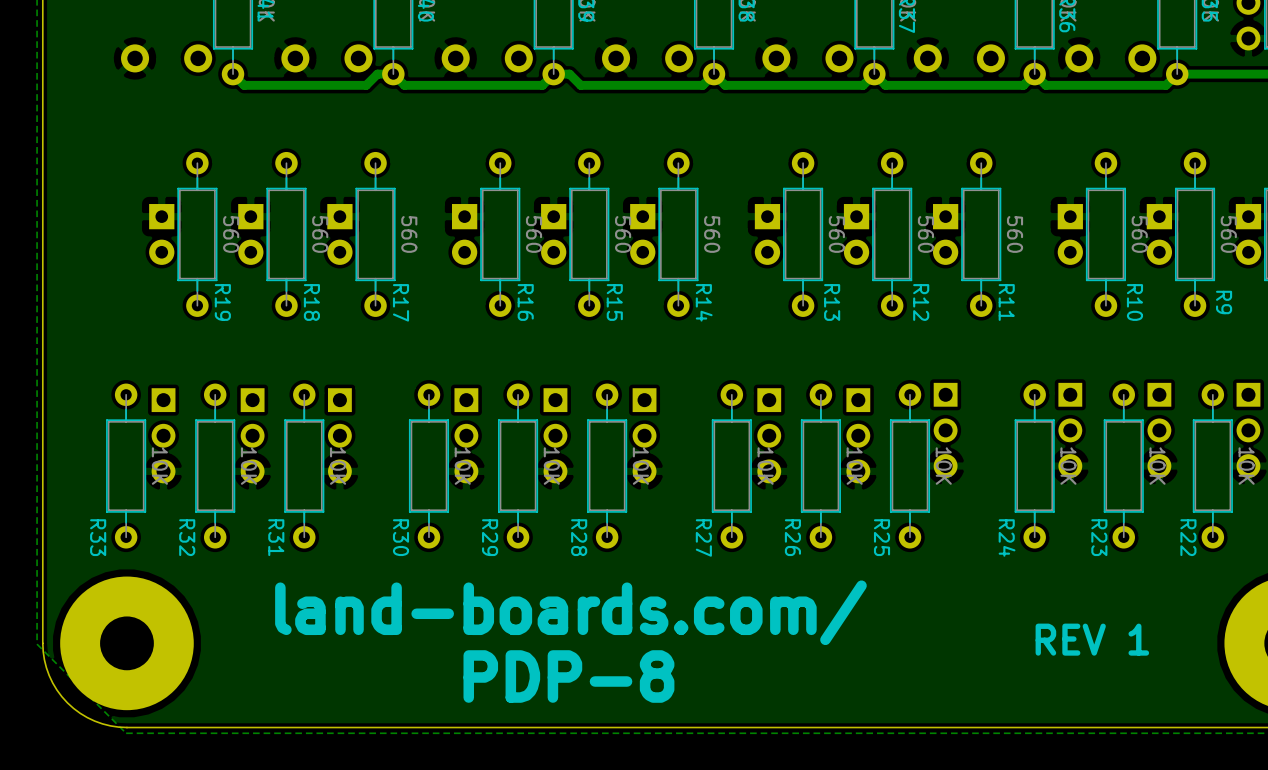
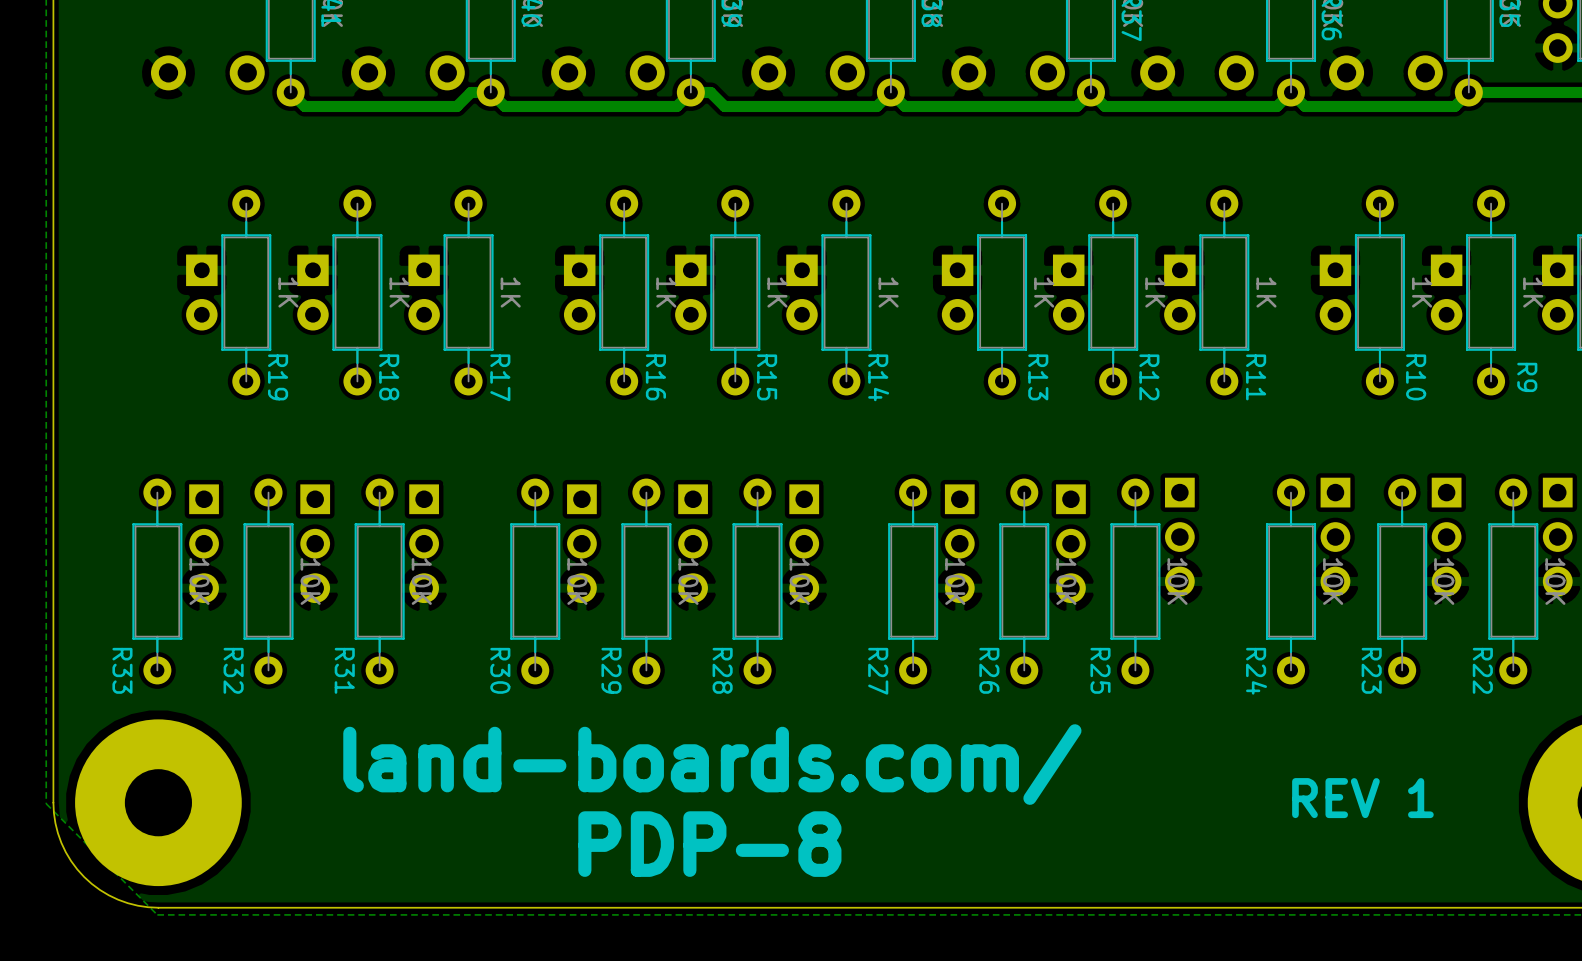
R19 value: 560 (231, 234) -> 1K (288, 292)
R18 value: 560 (320, 234) -> 1K (399, 292)
R17 value: 560 (409, 234) -> 1K (510, 292)
R16 value: 560 (534, 234) -> 1K (666, 292)
R15 value: 560 (623, 234) -> 1K (777, 292)
R14 value: 560 (712, 234) -> 1K (888, 292)
R13 value: 560 (836, 234) -> 1K (1044, 292)
R12 value: 560 (925, 234) -> 1K (1155, 292)
R11 value: 560 (1015, 234) -> 1K (1266, 292)
R10 value: 560 (1139, 234) -> 1K (1422, 292)
R9 value: 560 (1228, 234) -> 1K (1533, 292)

